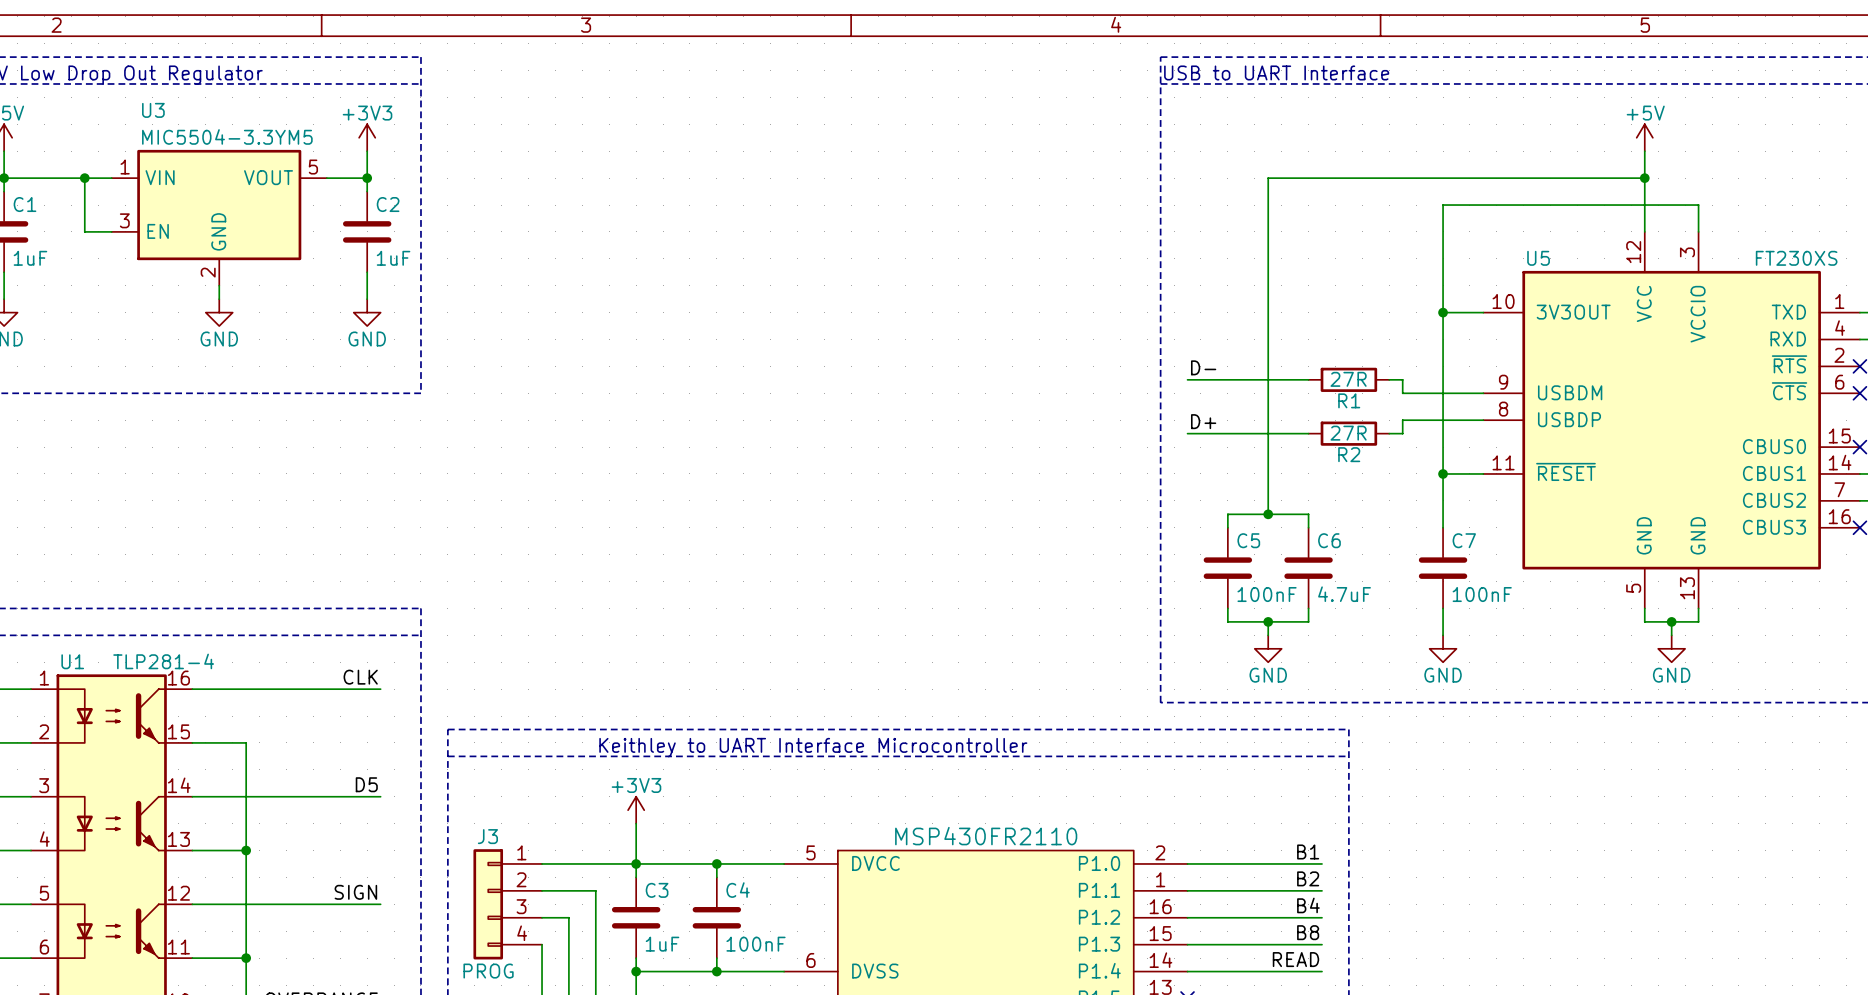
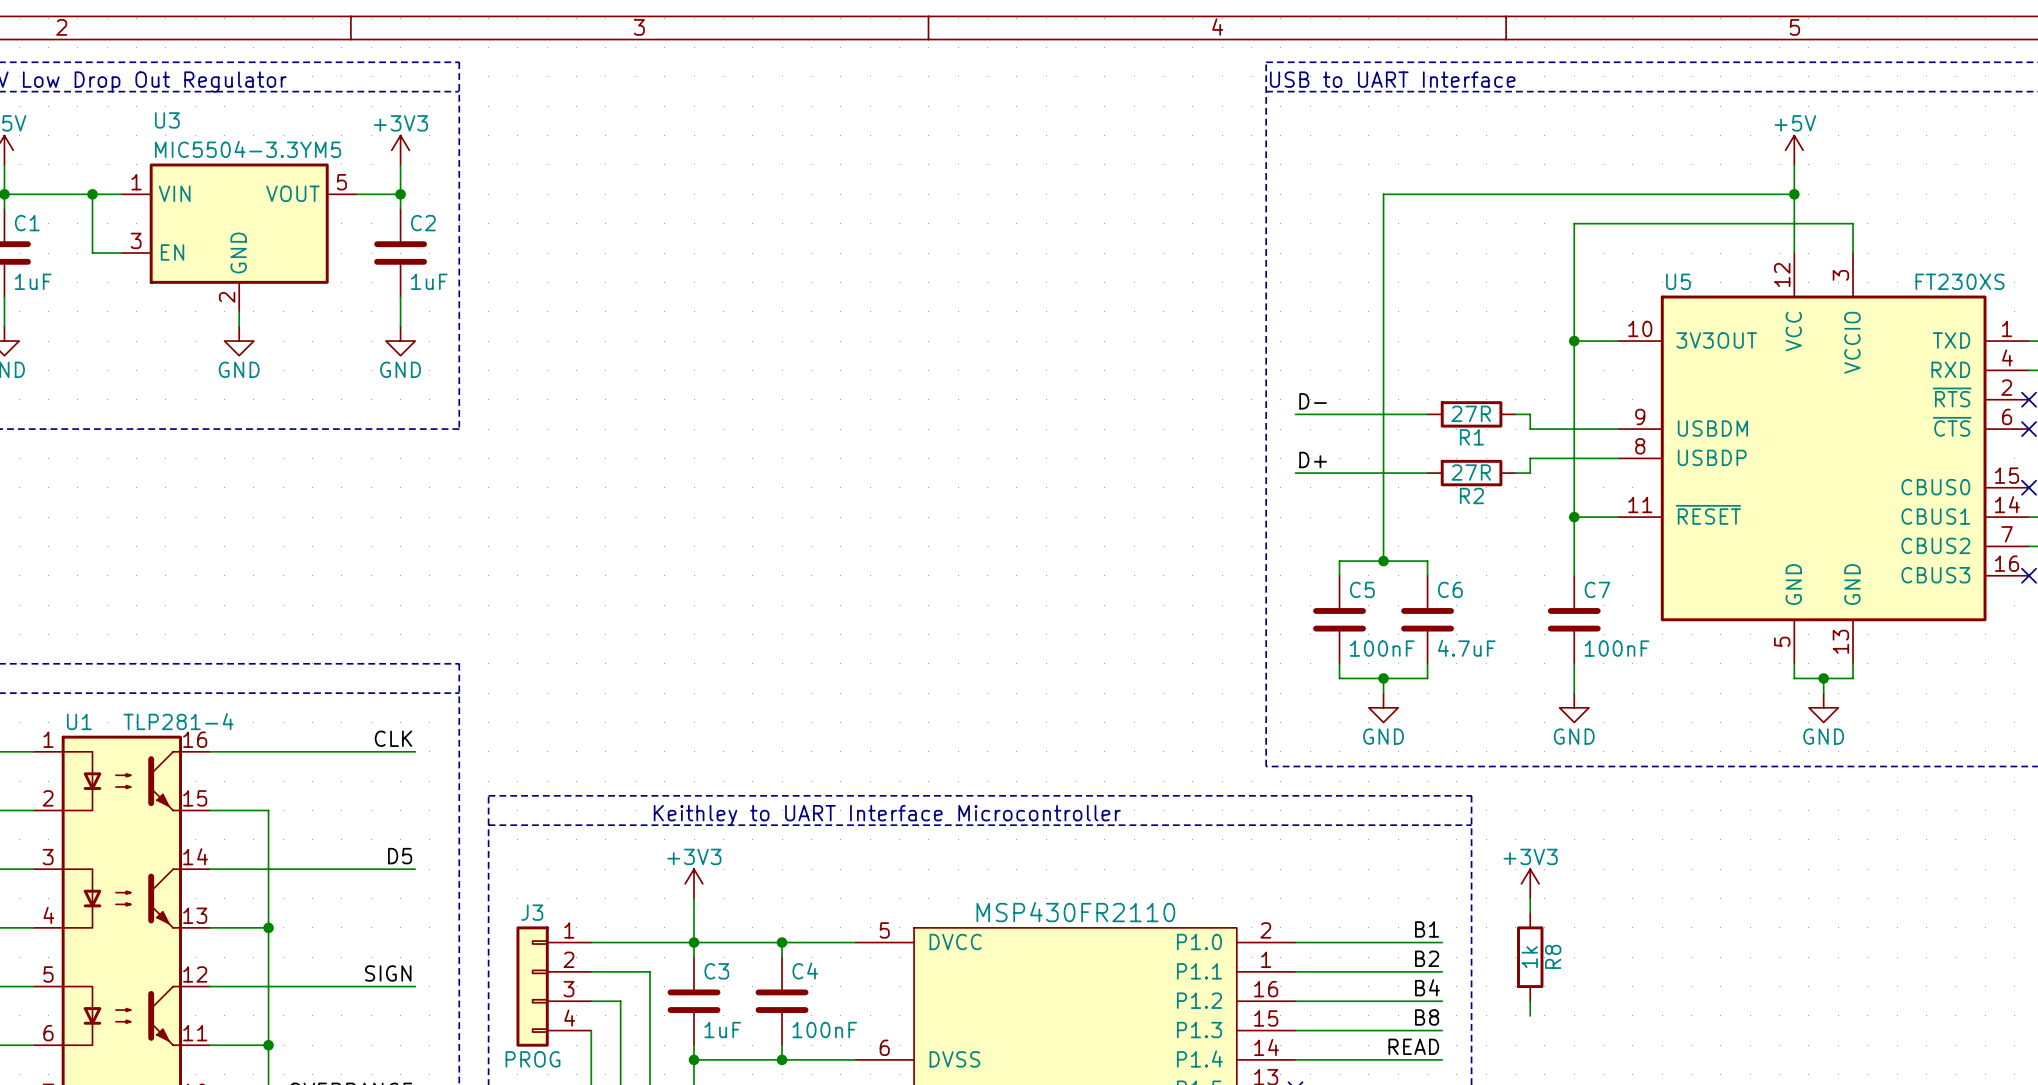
power symbol: none -> +3V3 (1530, 883)
wire: none -> (1530, 898) (1530, 913)
R8: none -> 1k (1530, 957)
wire: none -> (1530, 1001) (1530, 1015)

